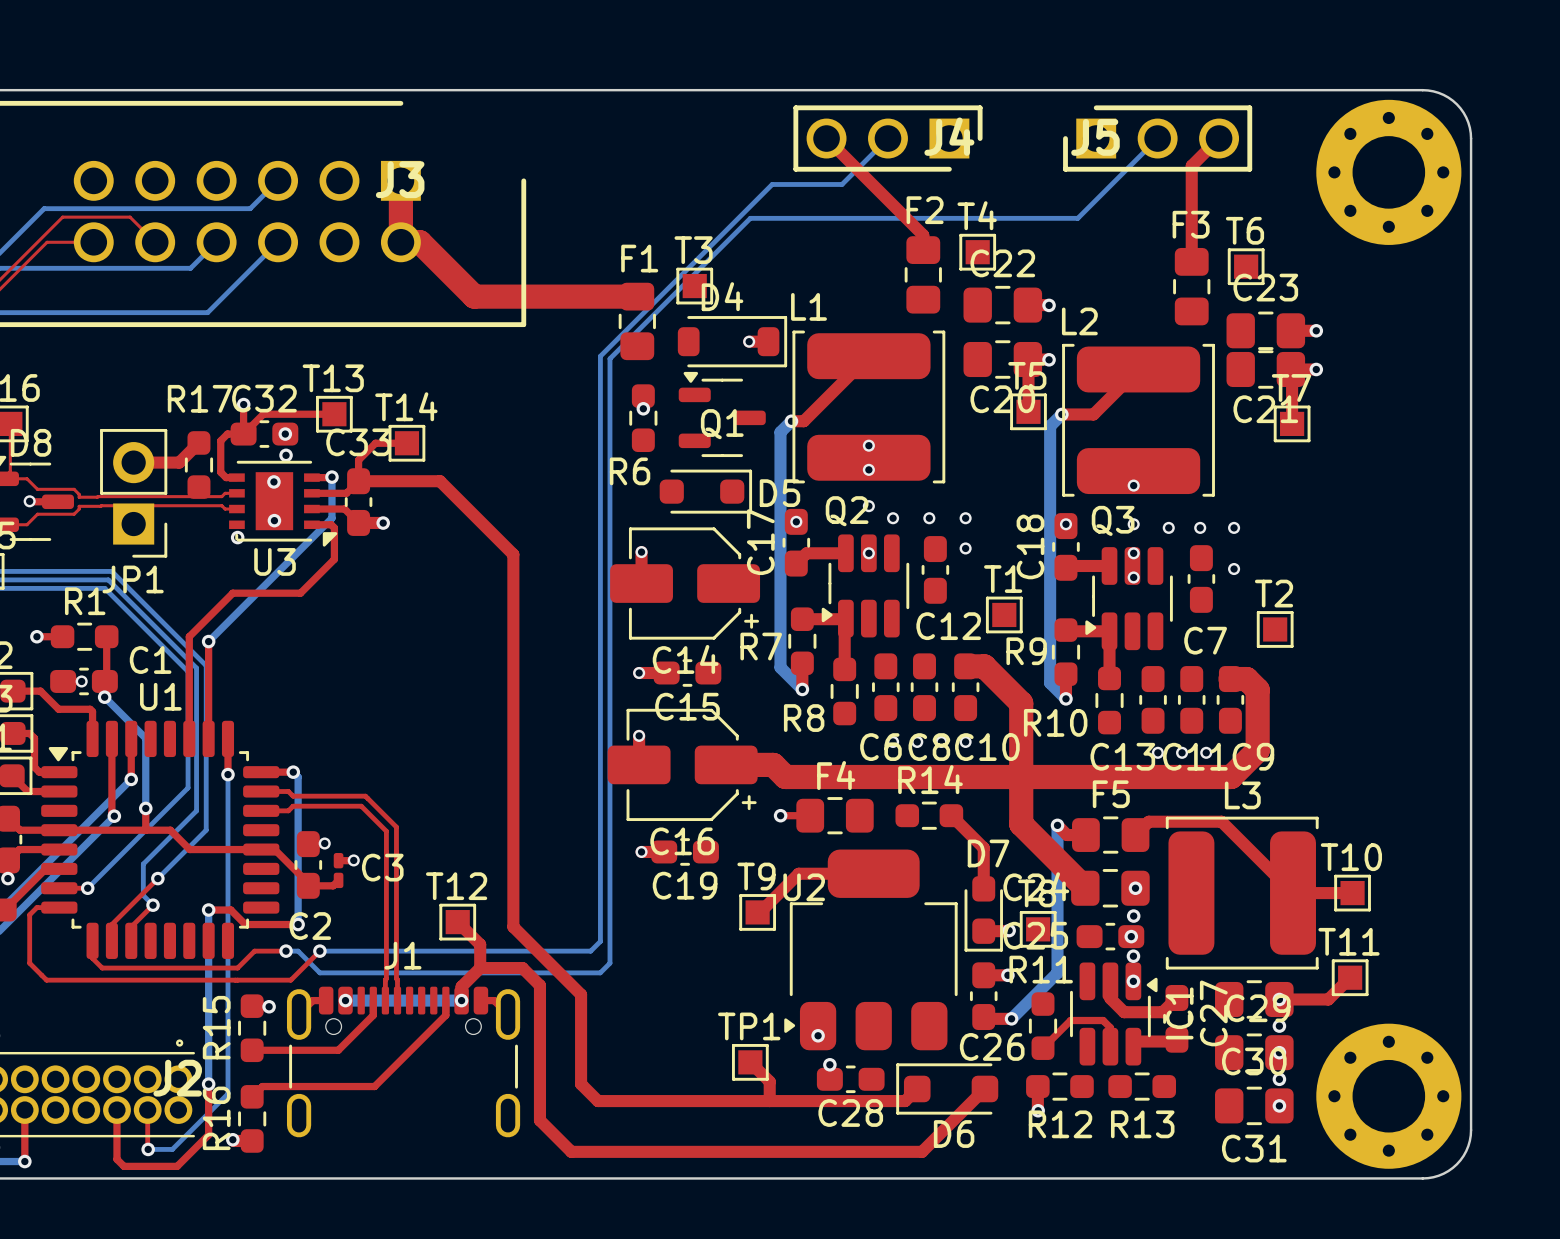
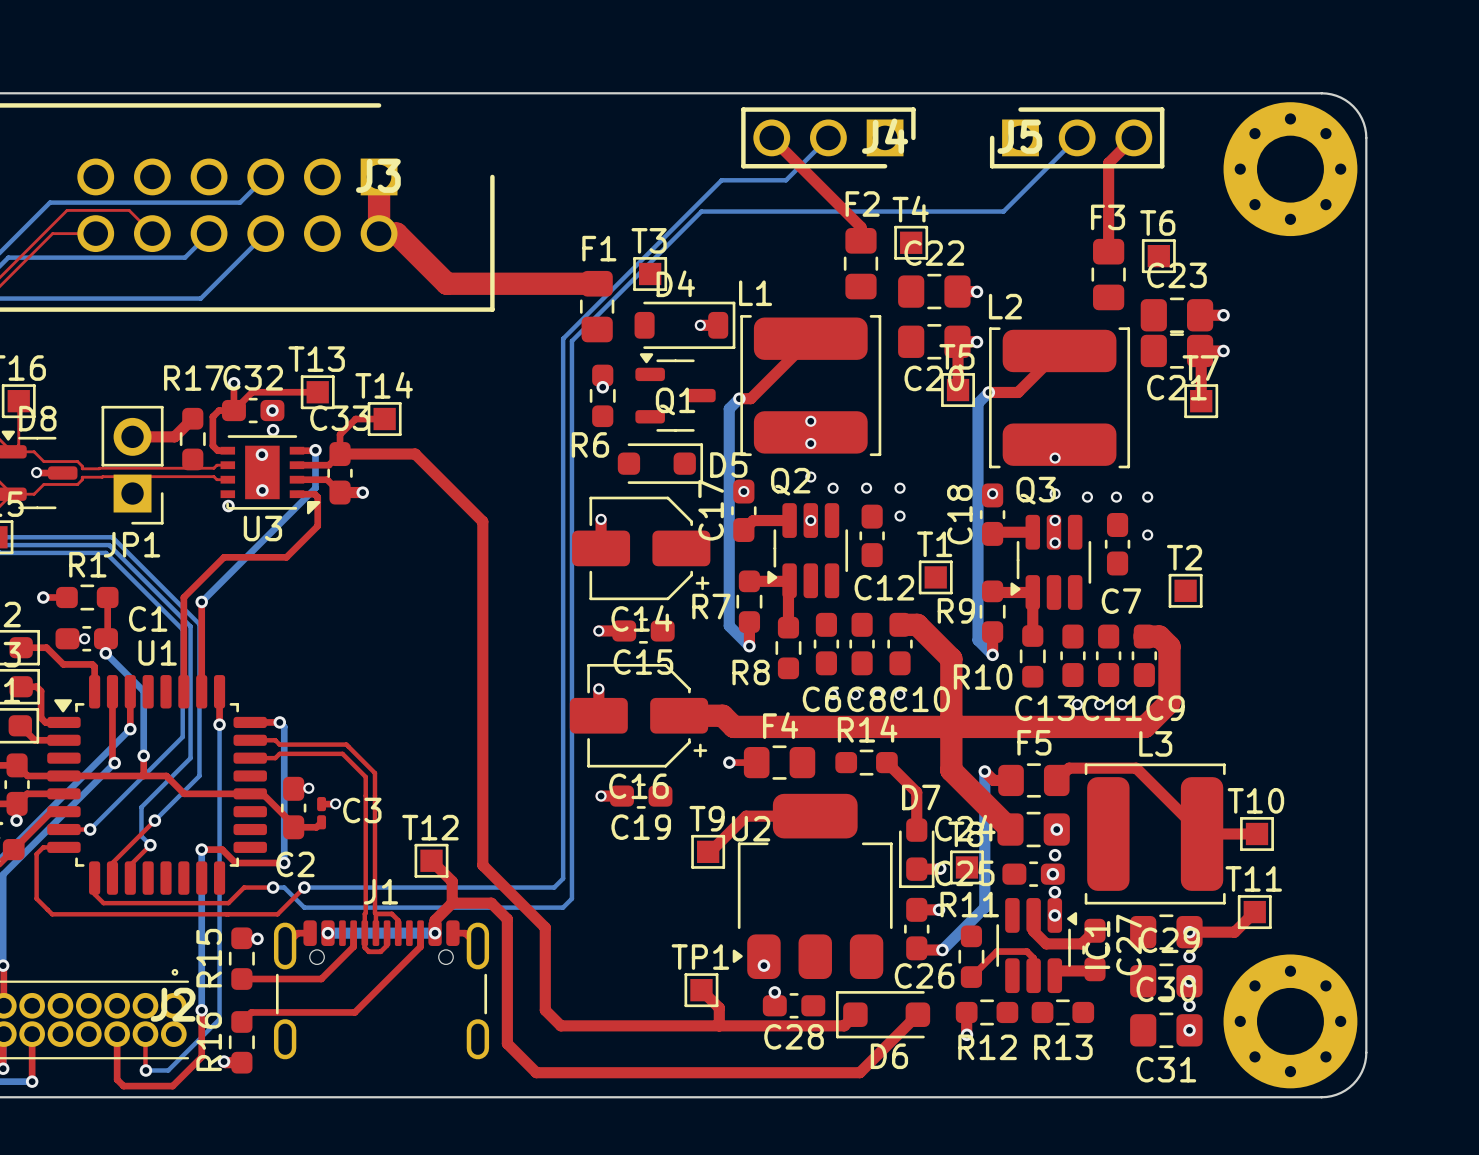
top track: none -> (375, 913) (391, 913) (398, 920) (398, 933)
top track: none -> (364, 933) (364, 947) (368, 951) (380, 951) (387, 945) (387, 933)

